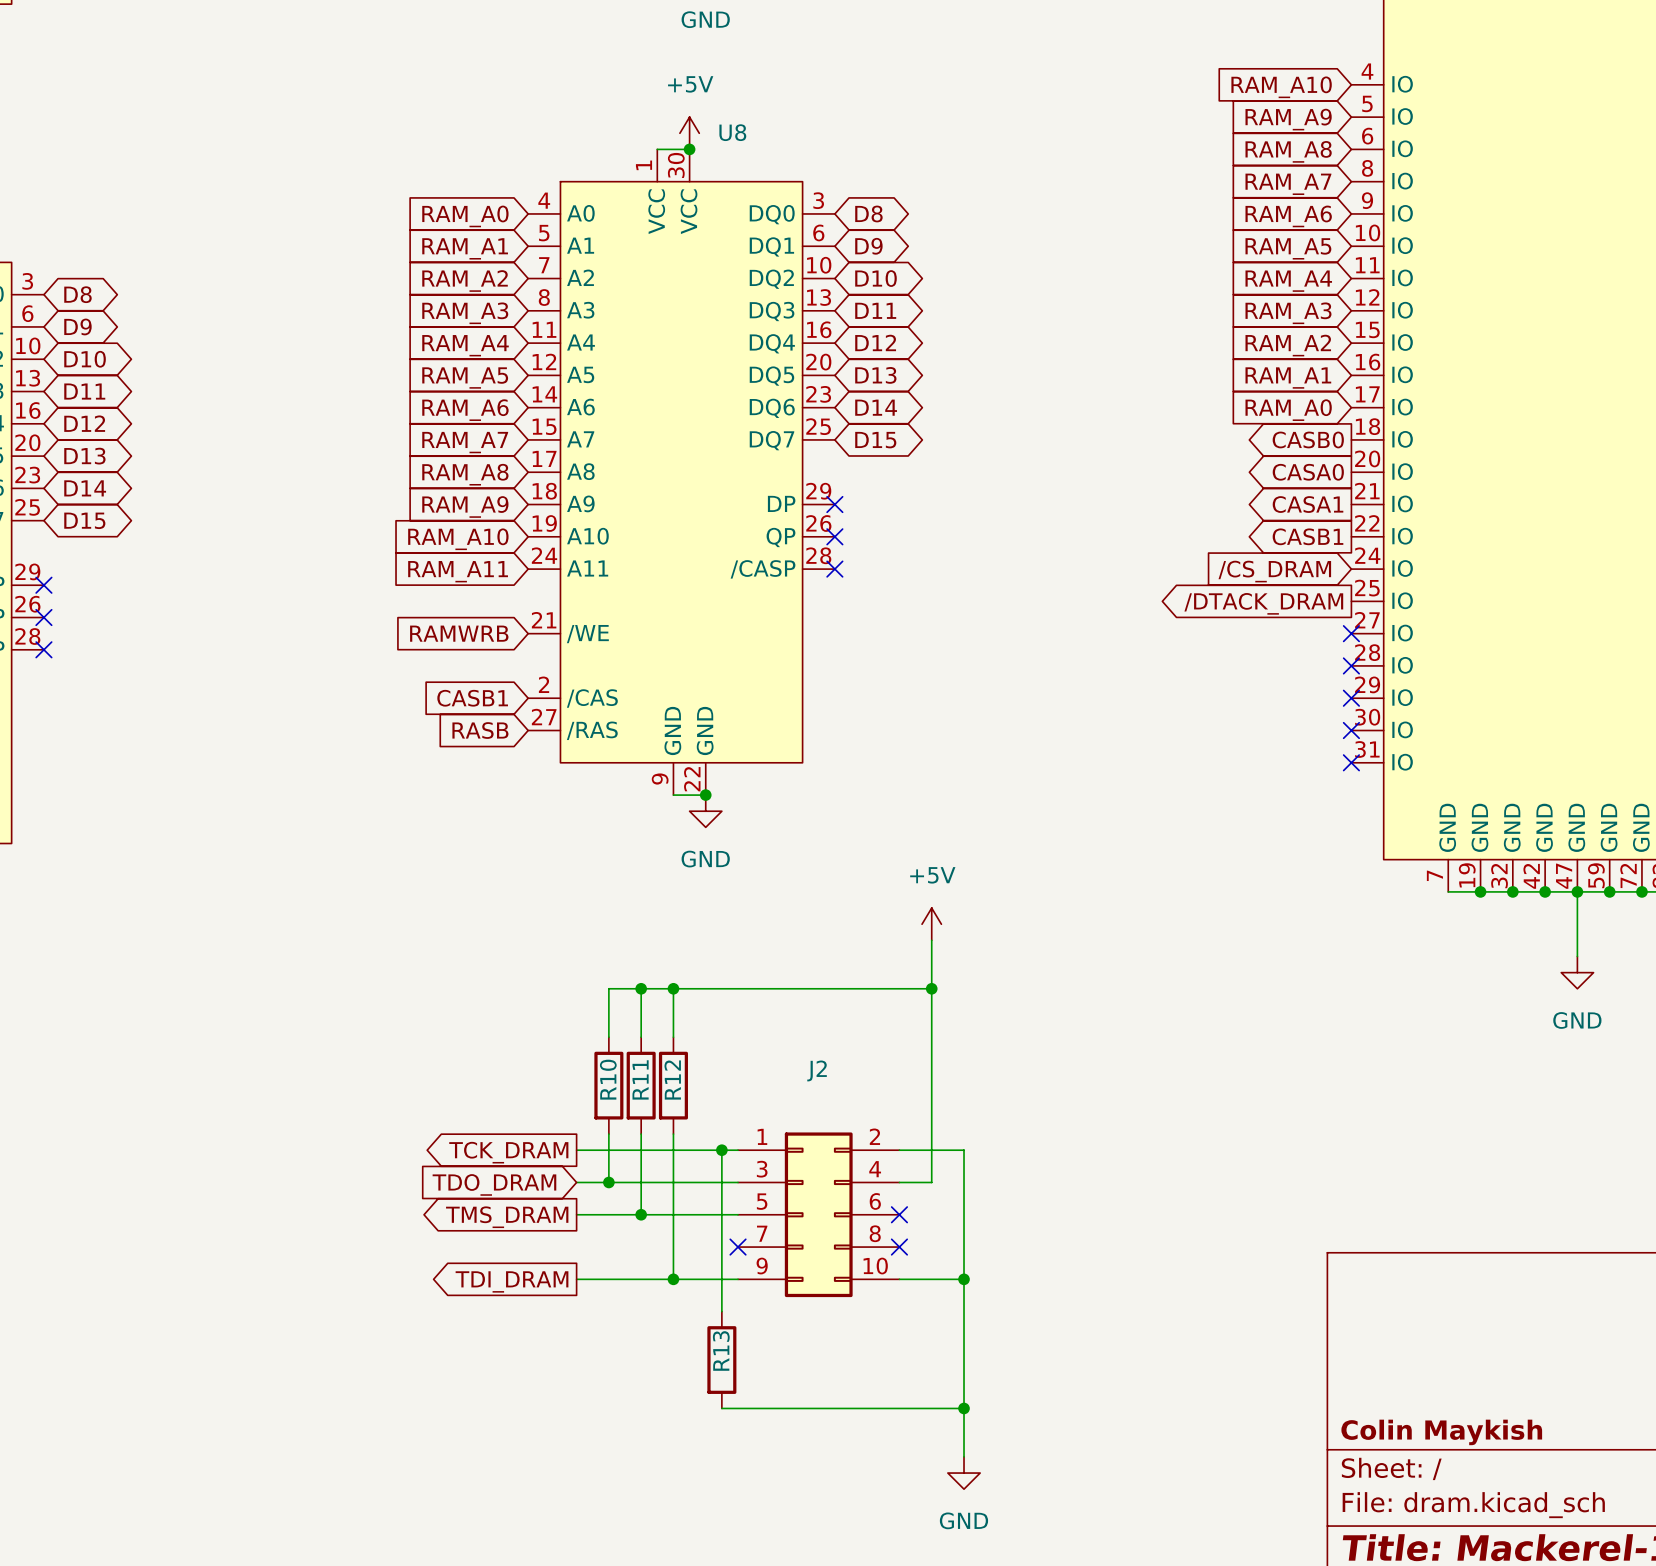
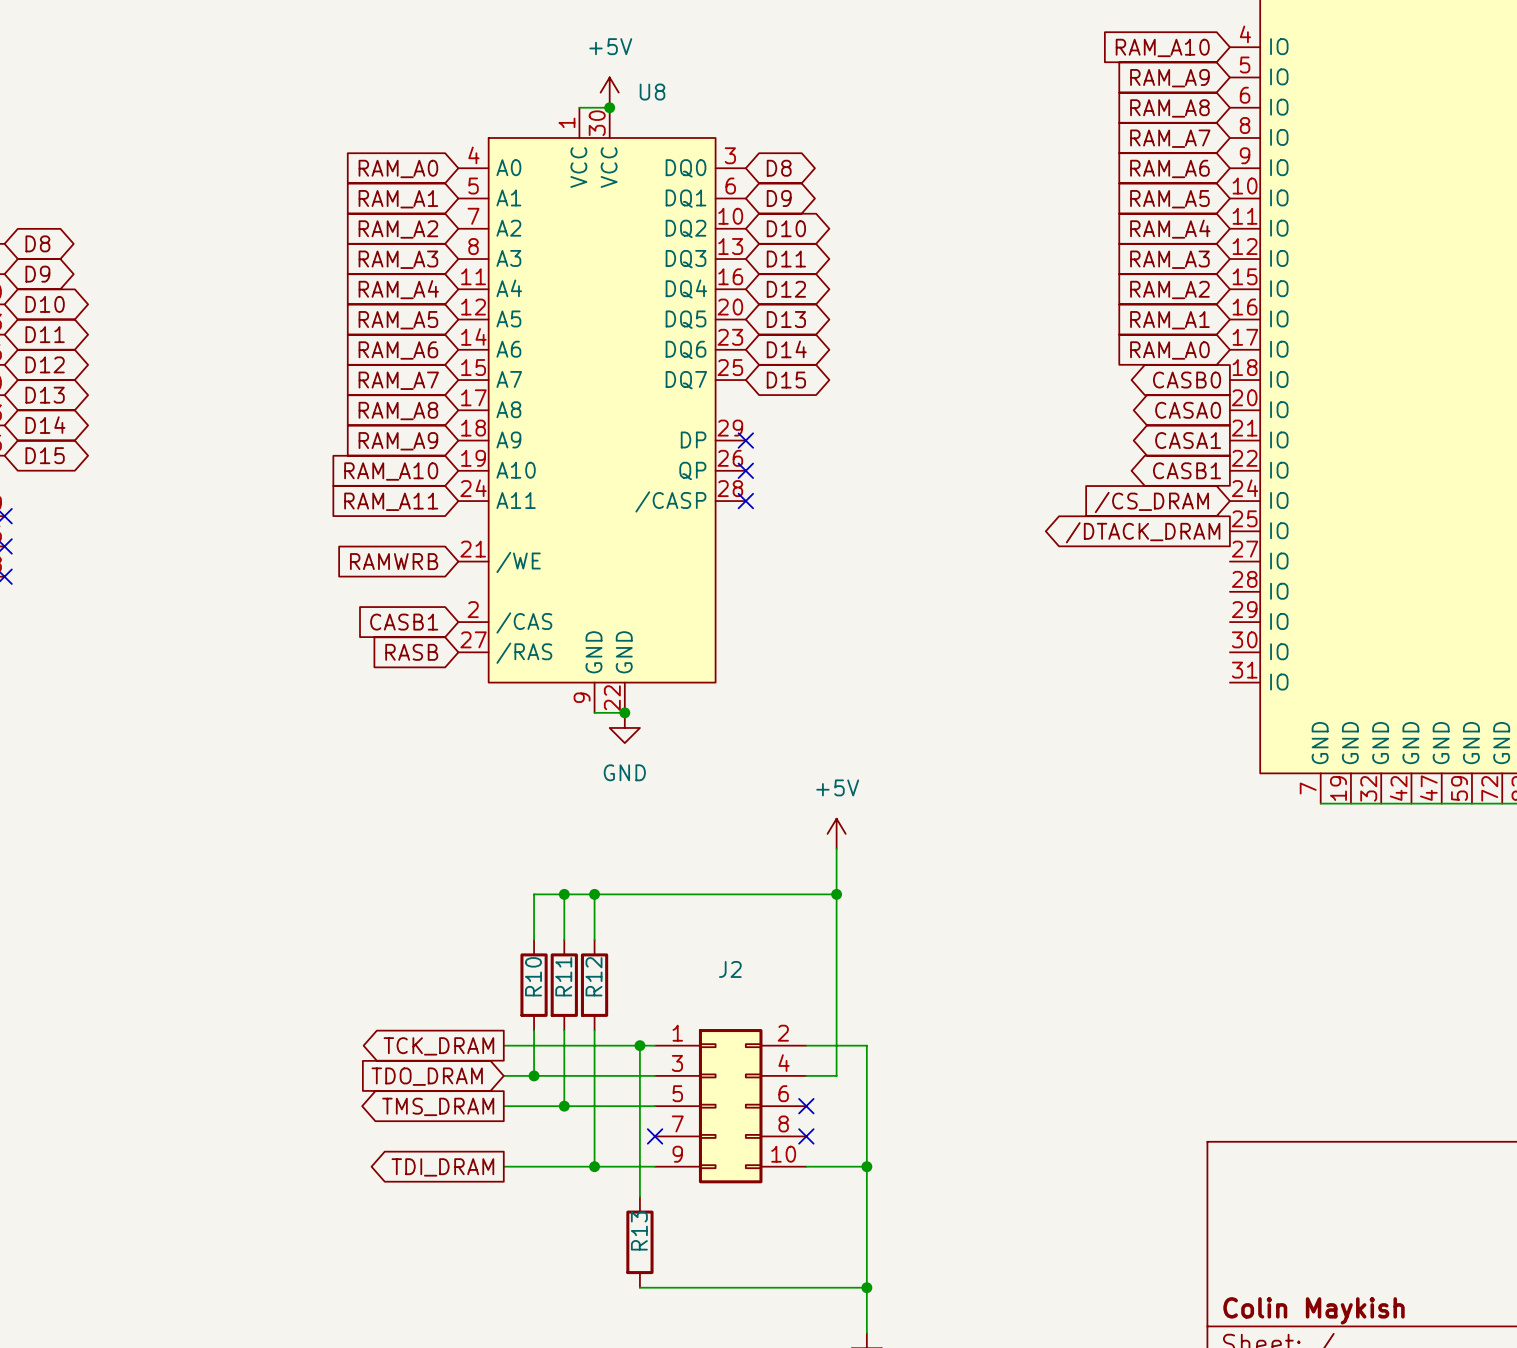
no-connect mark: (1351, 633) -> none
no-connect mark: (1351, 665) -> none
no-connect mark: (1351, 698) -> none
no-connect mark: (1351, 730) -> none
no-connect mark: (1351, 762) -> none
junction: (1480, 891) -> none
junction: (1512, 891) -> none
junction: (1545, 891) -> none
wire: (1577, 891) (1577, 956) -> none
junction: (1577, 891) -> none
junction: (1609, 891) -> none
junction: (1641, 891) -> none
power symbol: GND (1577, 972) -> none

